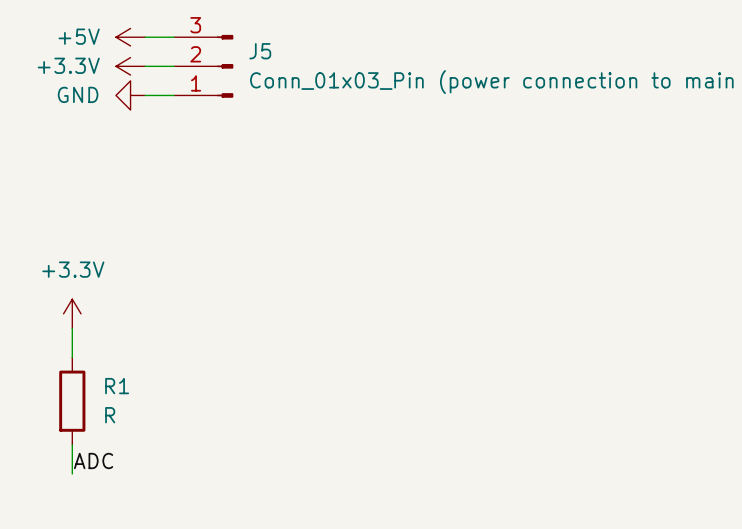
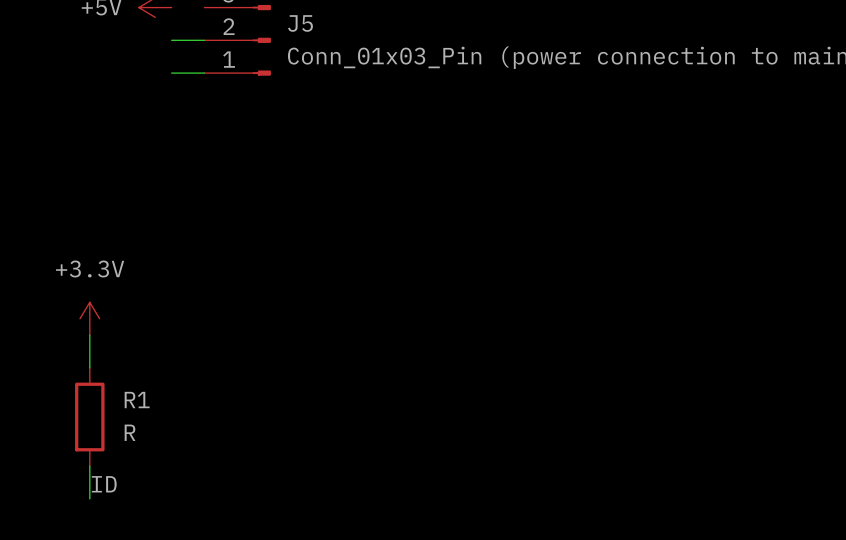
wire: (145, 37) (174, 37) -> none
power symbol: +3.3V (130, 66) -> none
power symbol: GND (130, 95) -> none
label: ADC (93, 460) -> ID (104, 484)

